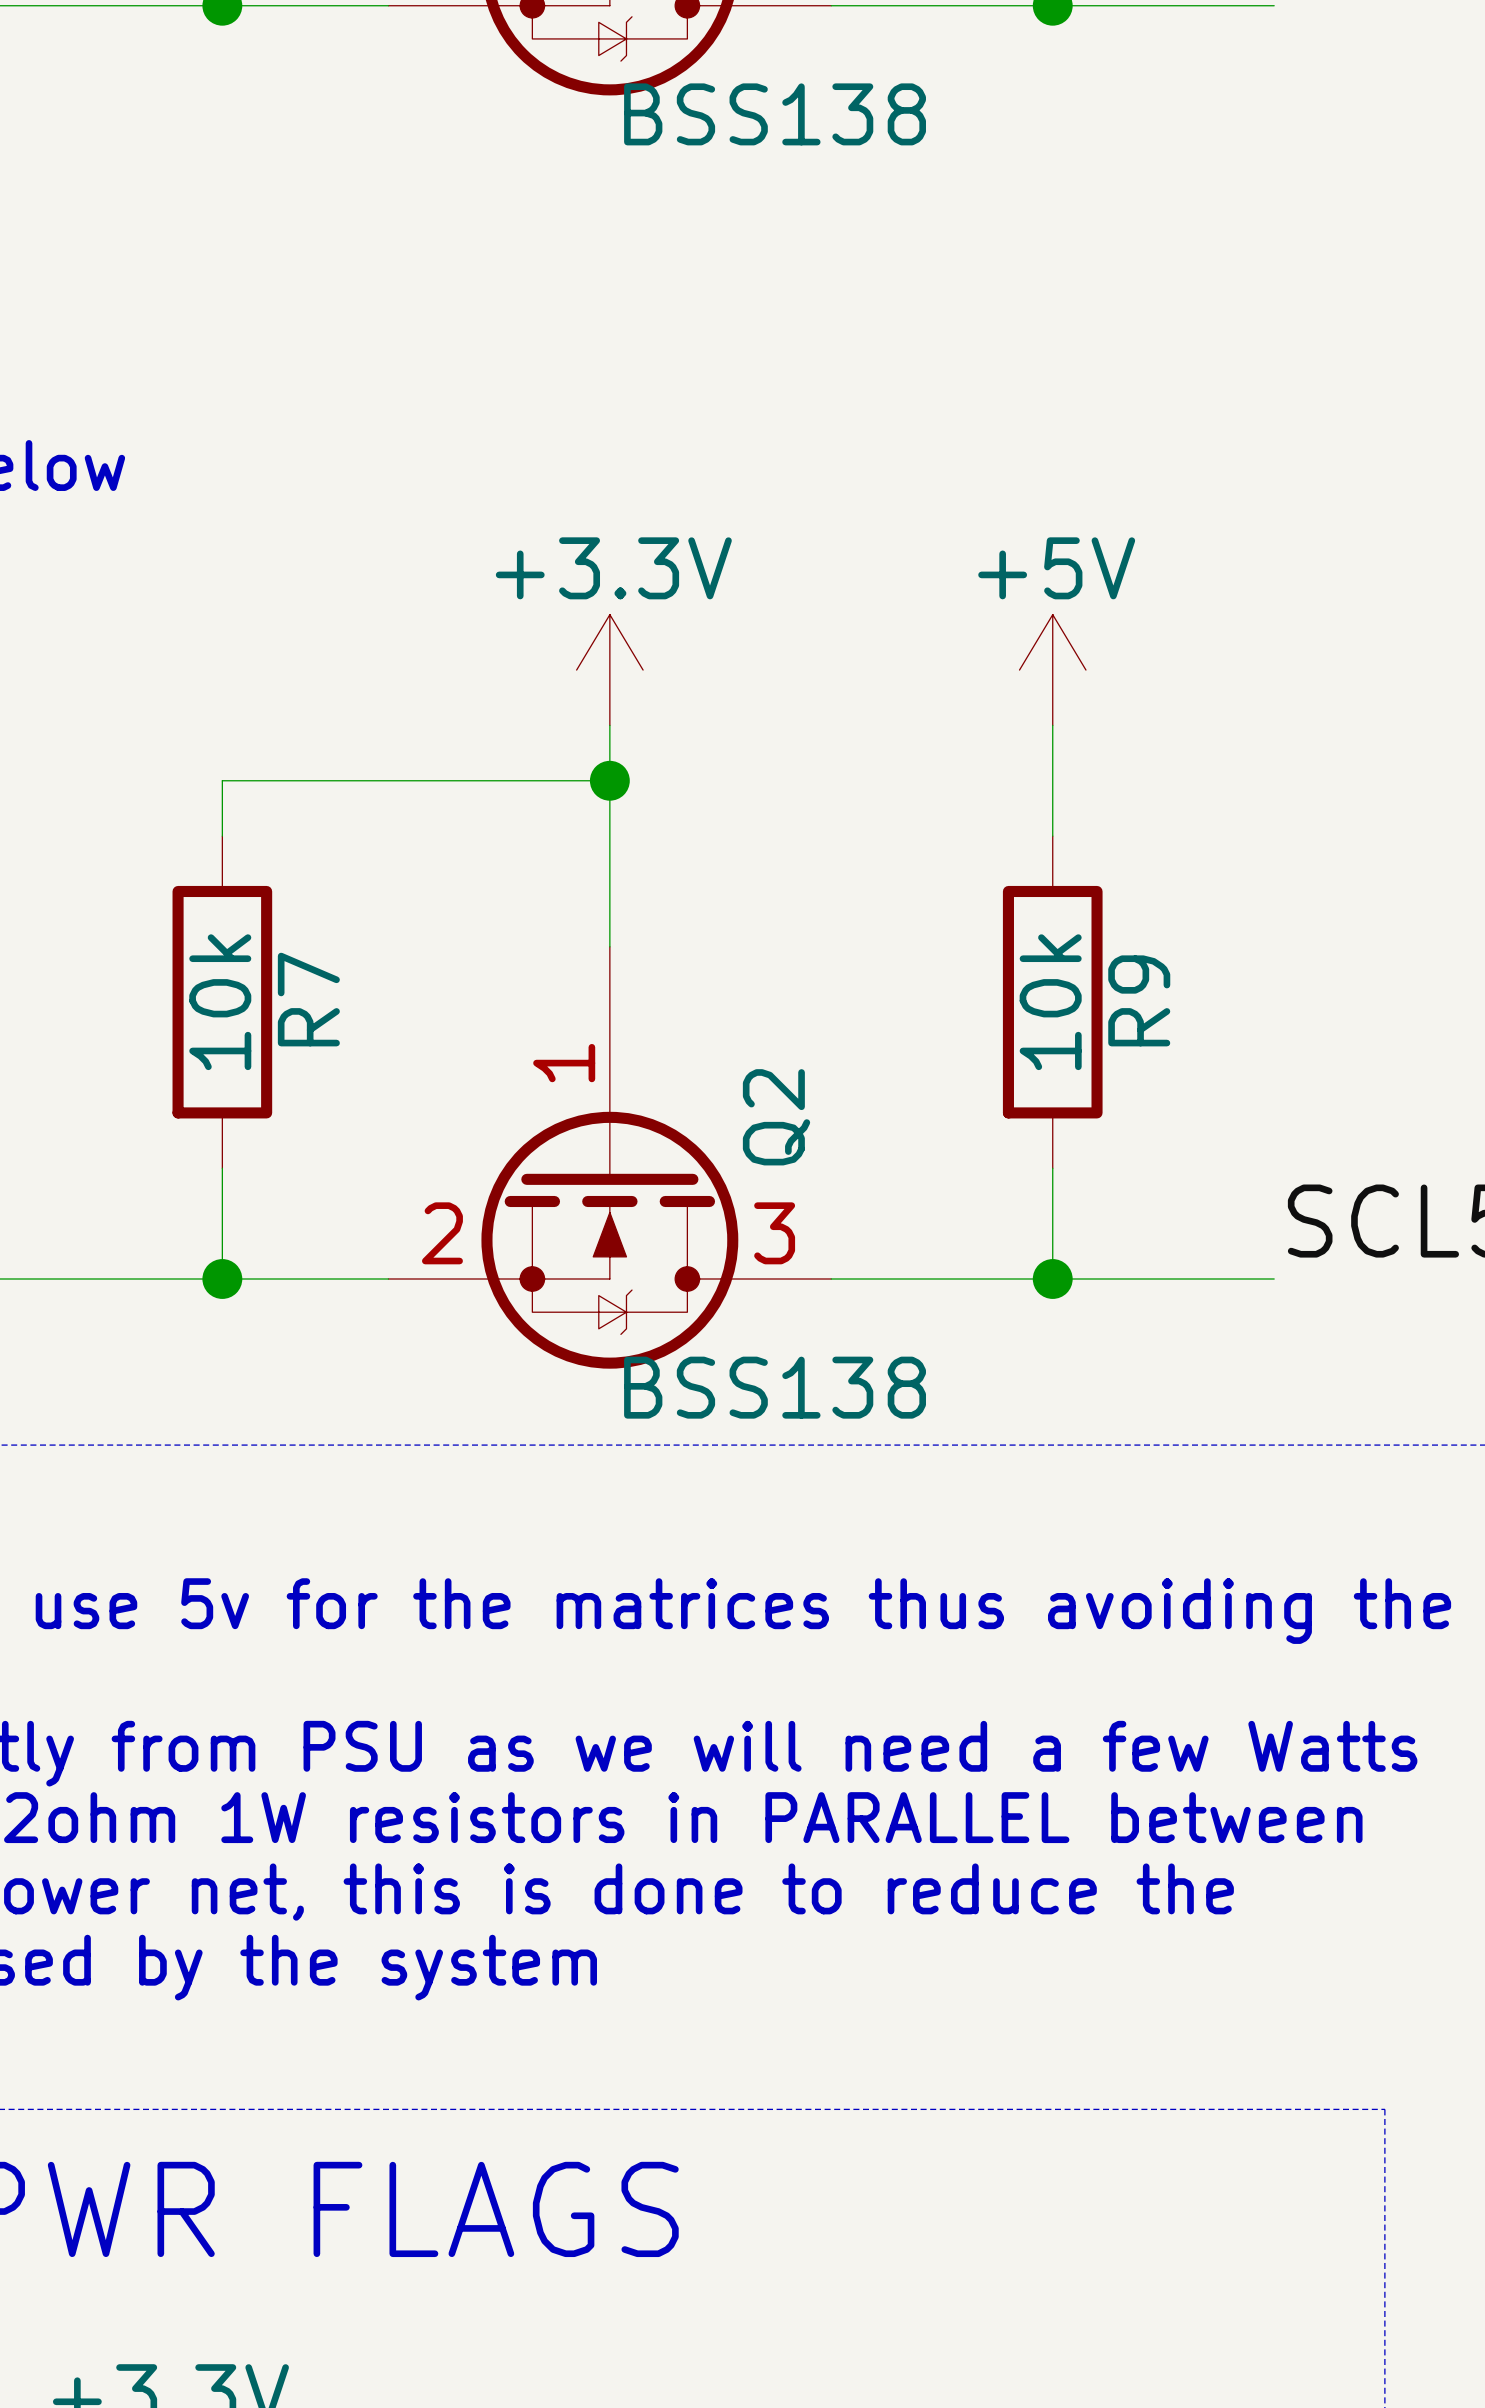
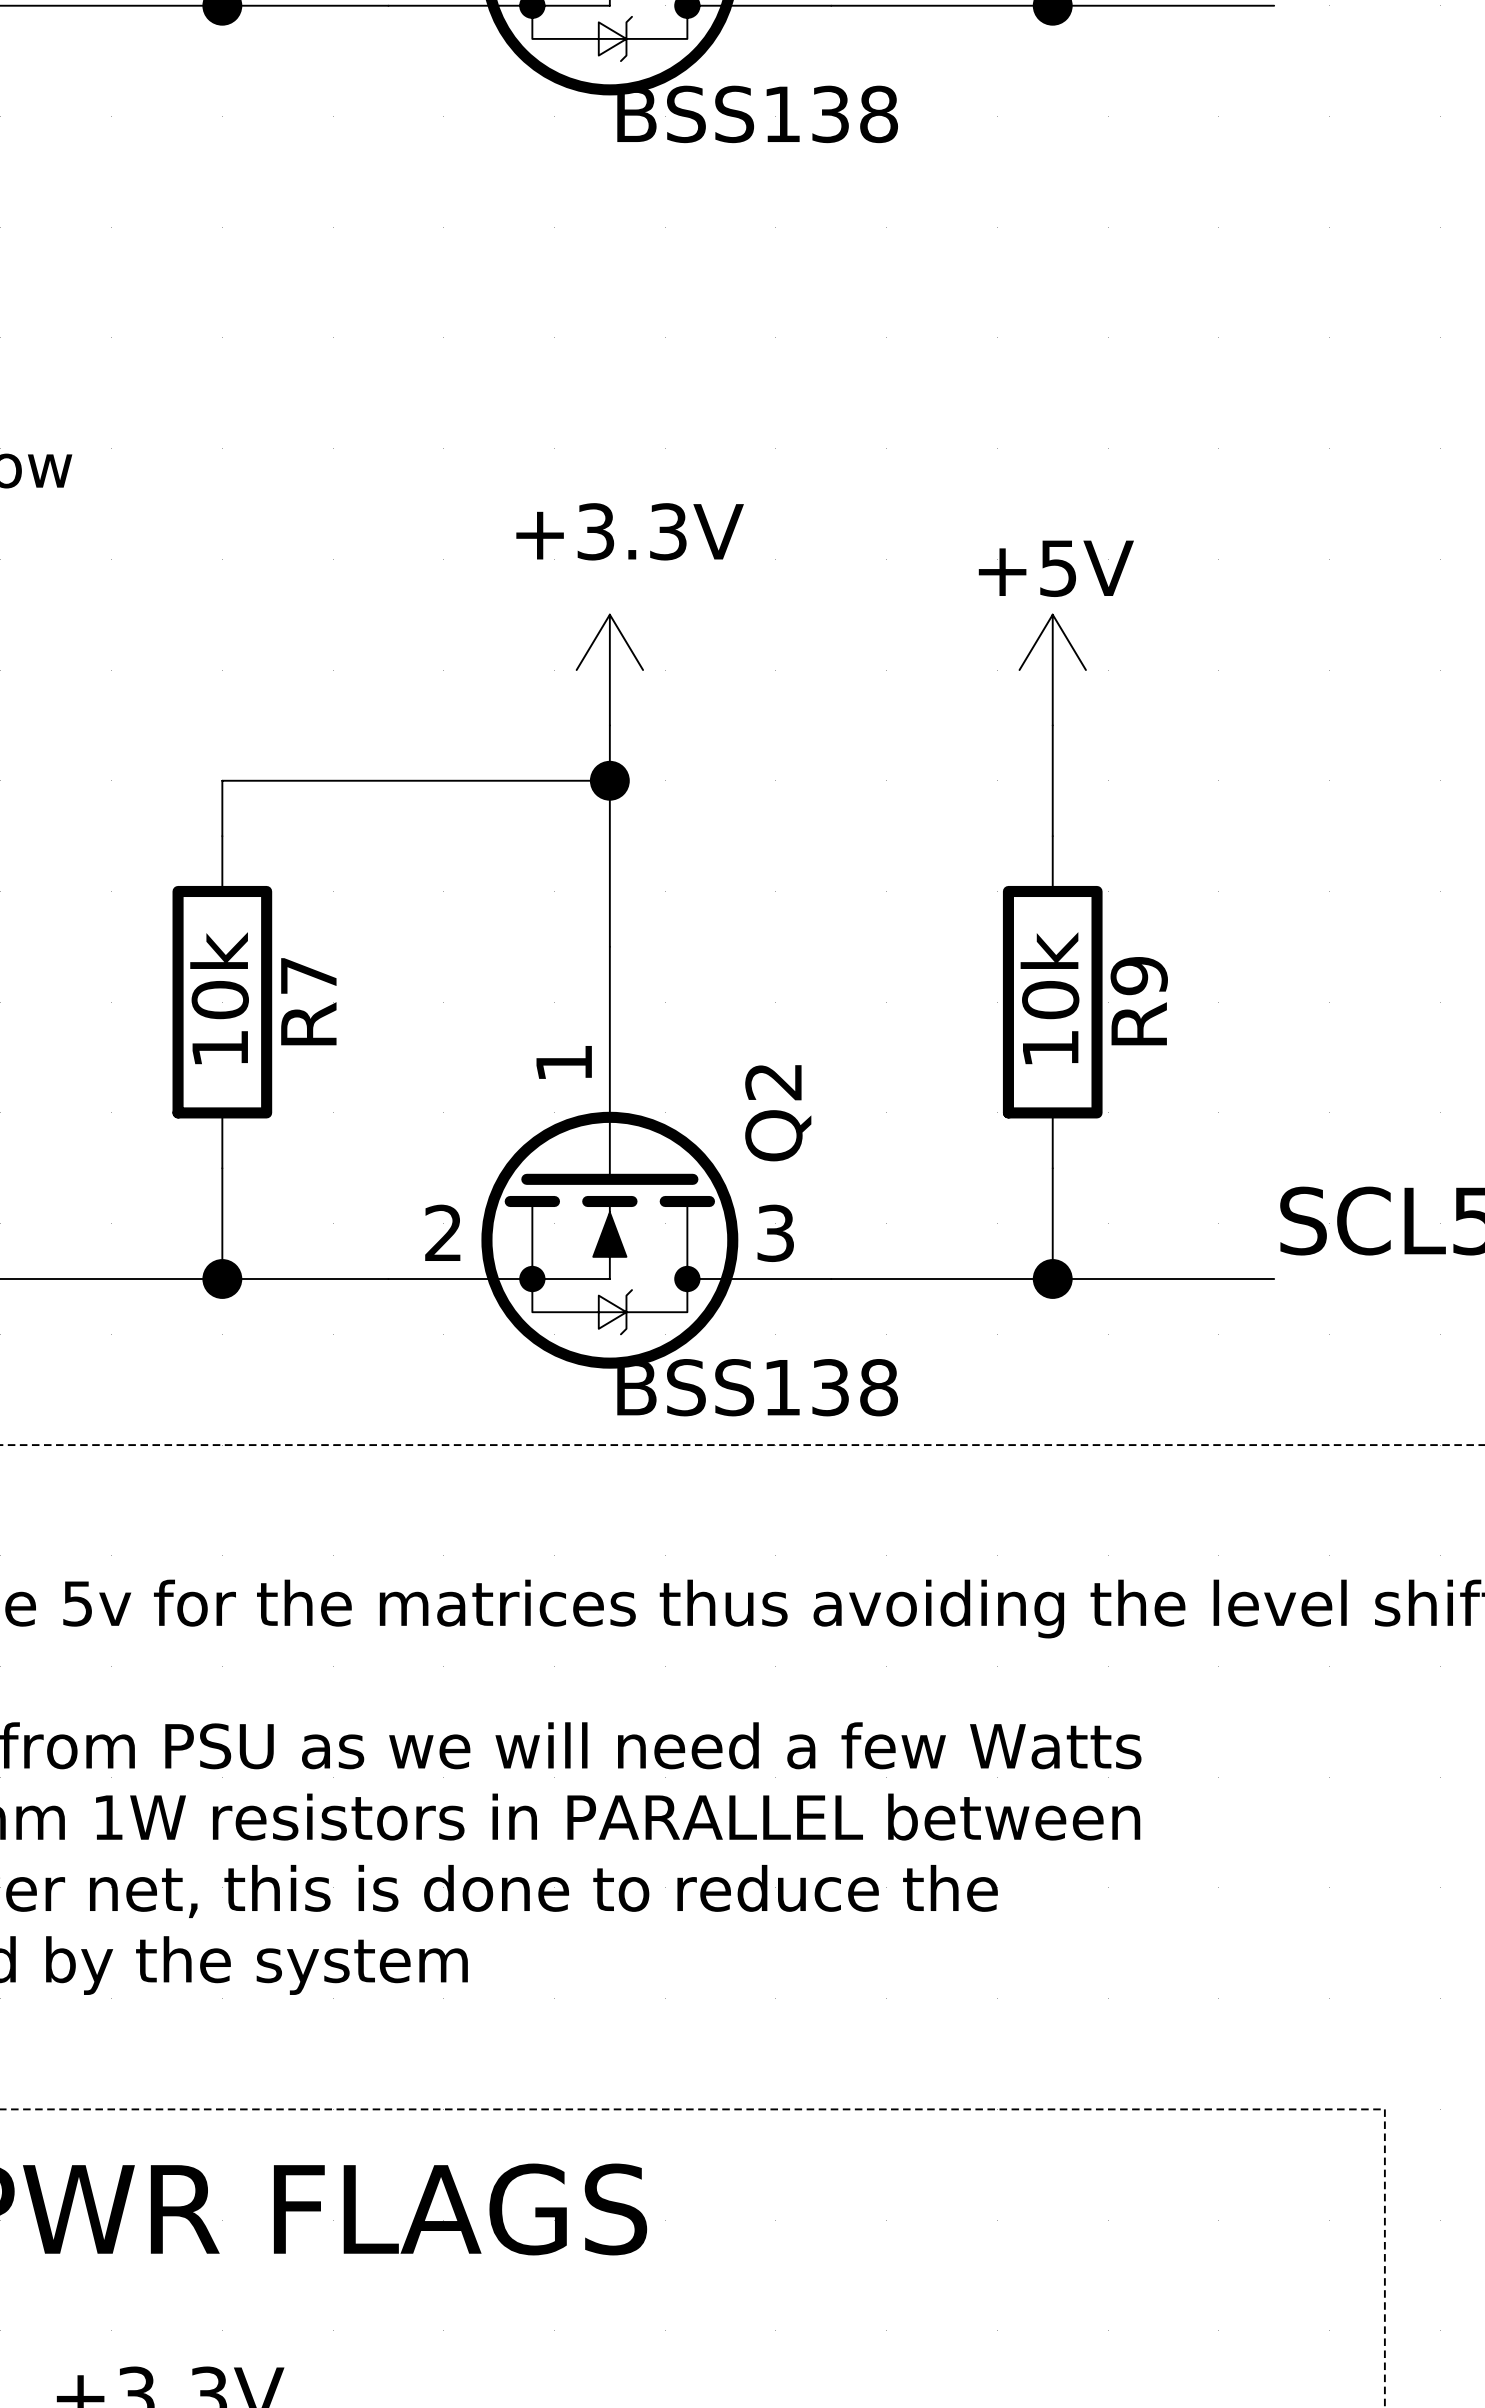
power symbol text position: +3.3V (613, 568) -> +3.3V (630, 531)

